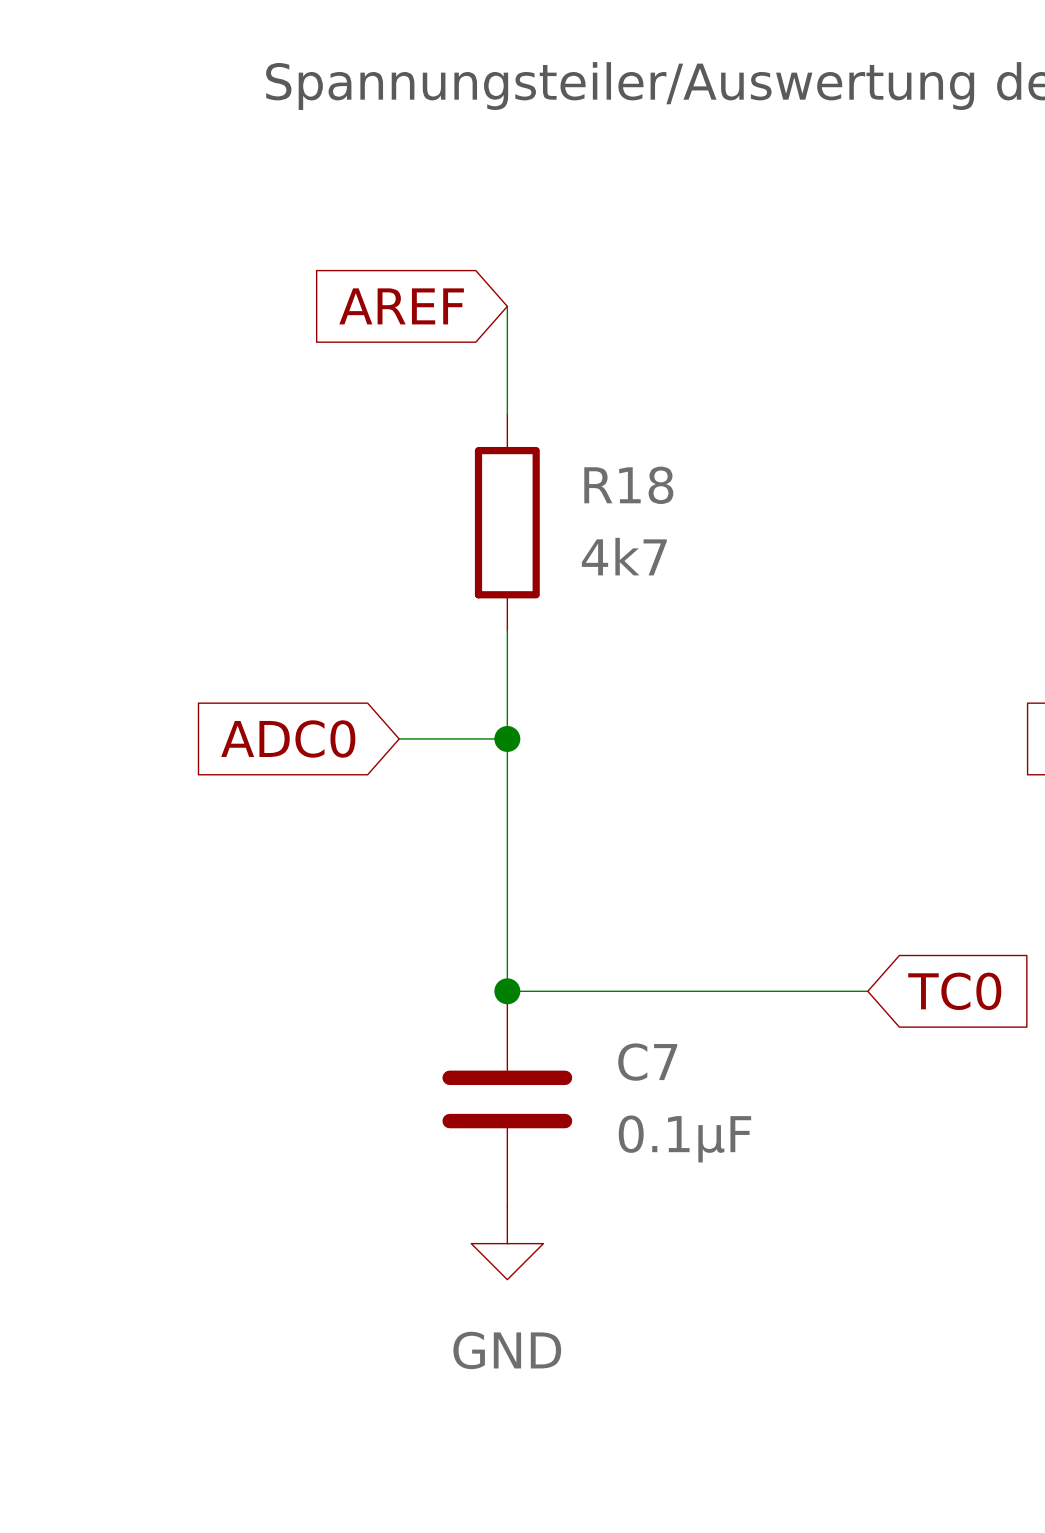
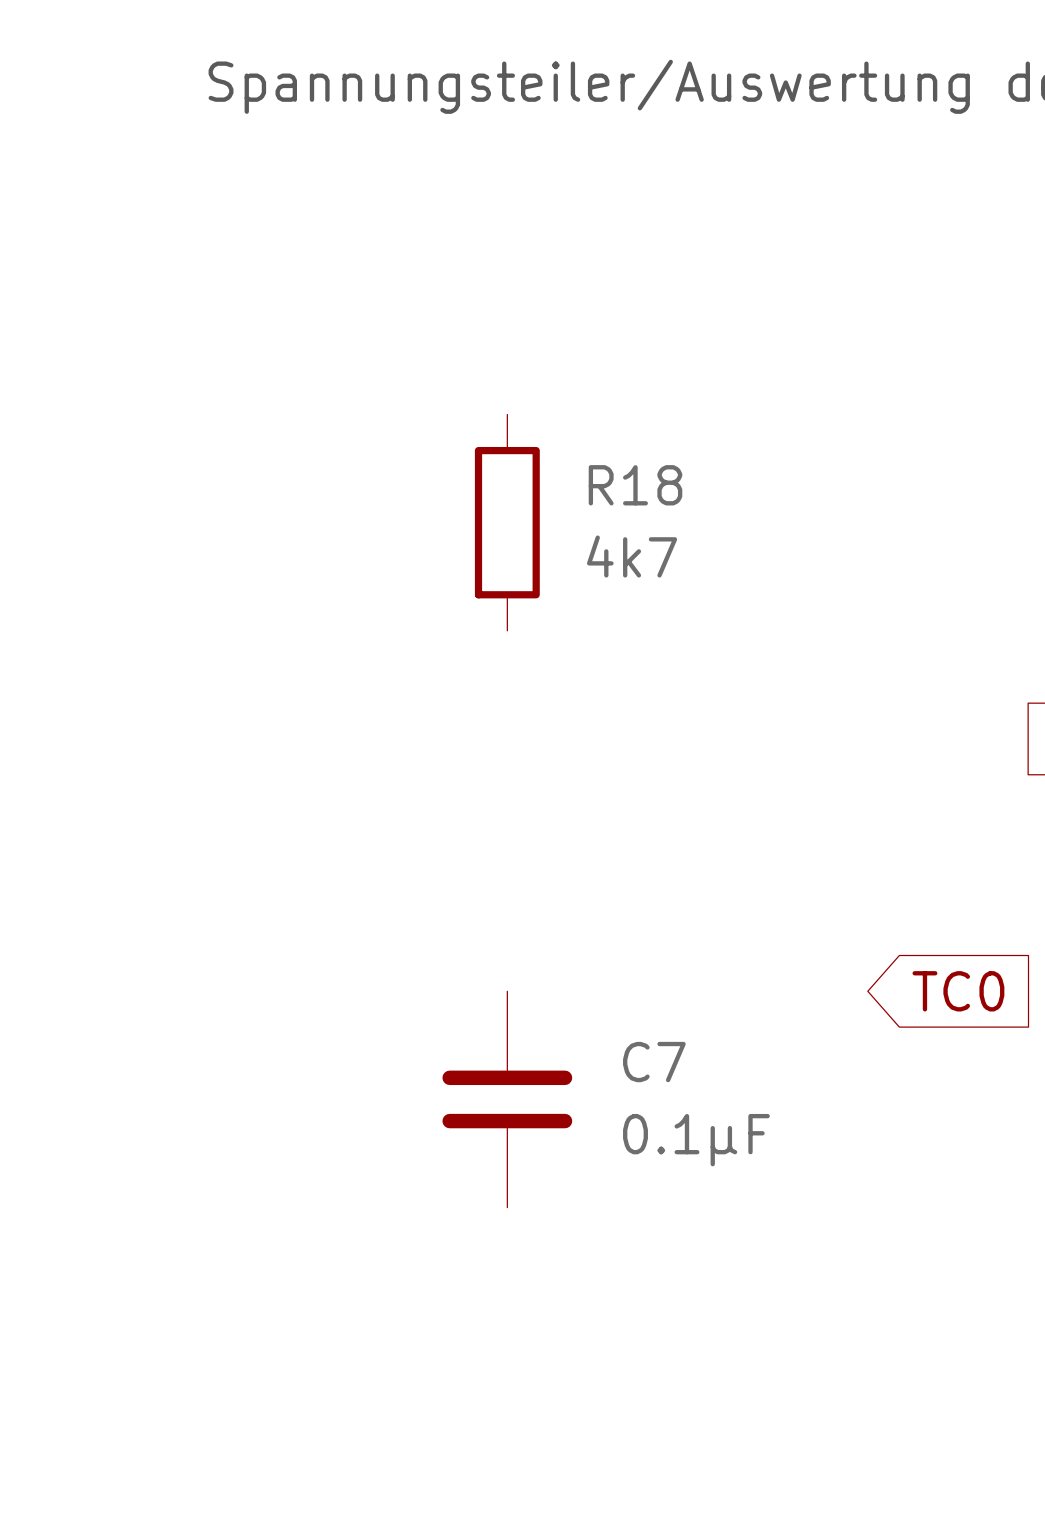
global label: AREF (401, 306) -> none
wire: (507, 306) (507, 414) -> none
wire: (507, 630) (507, 991) (867, 991) -> none
global label: ADC0 (288, 738) -> none
wire: (399, 738) (507, 738) -> none
junction: (507, 738) -> none
junction: (507, 991) -> none
power symbol: GND (507, 1243) -> none

